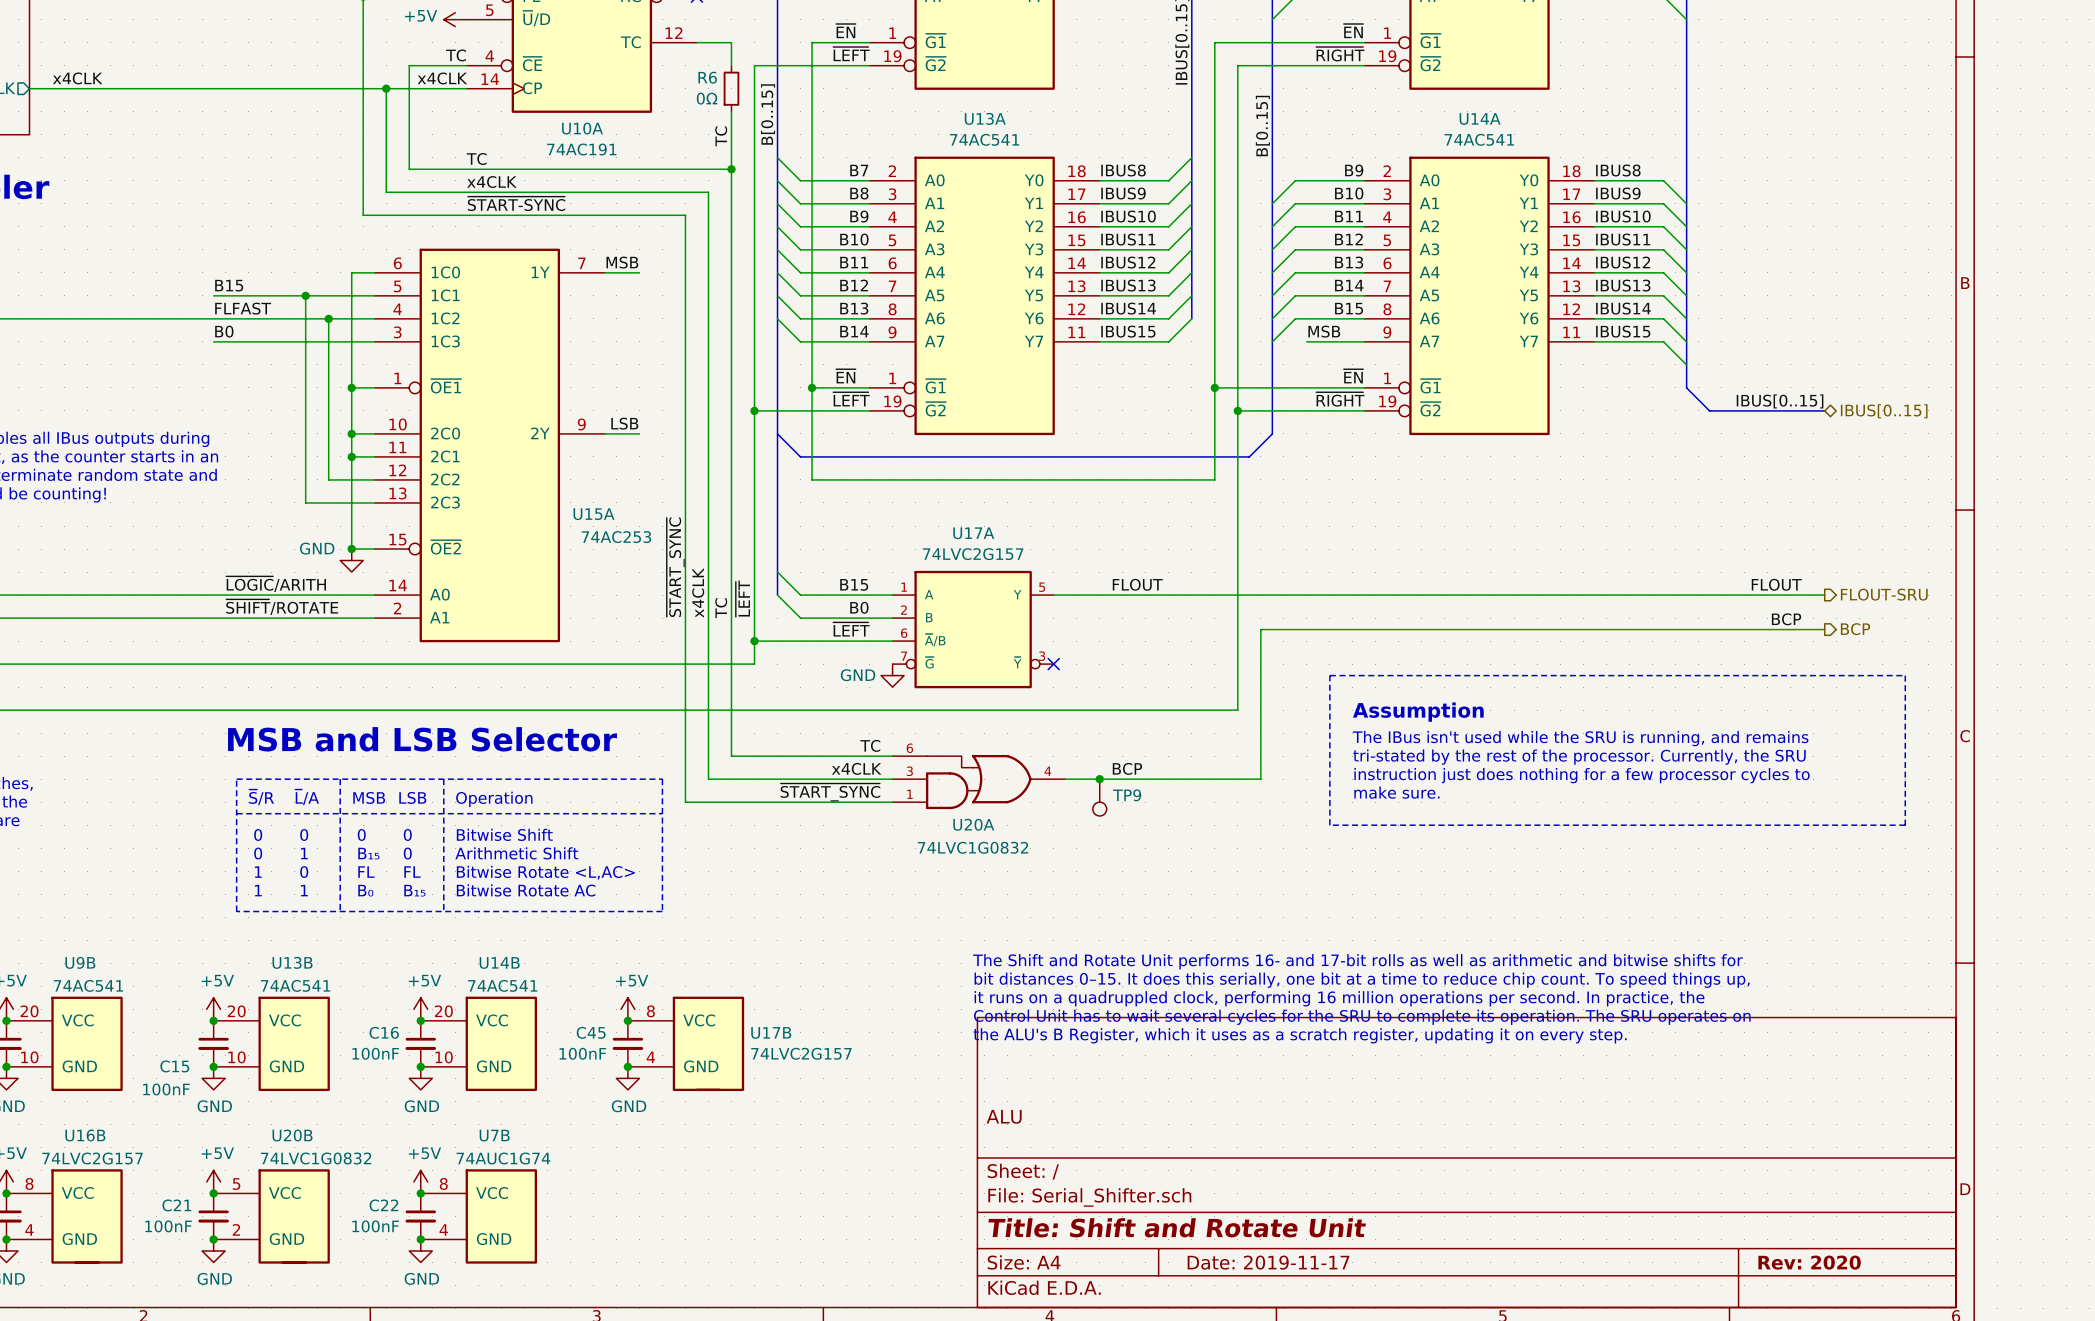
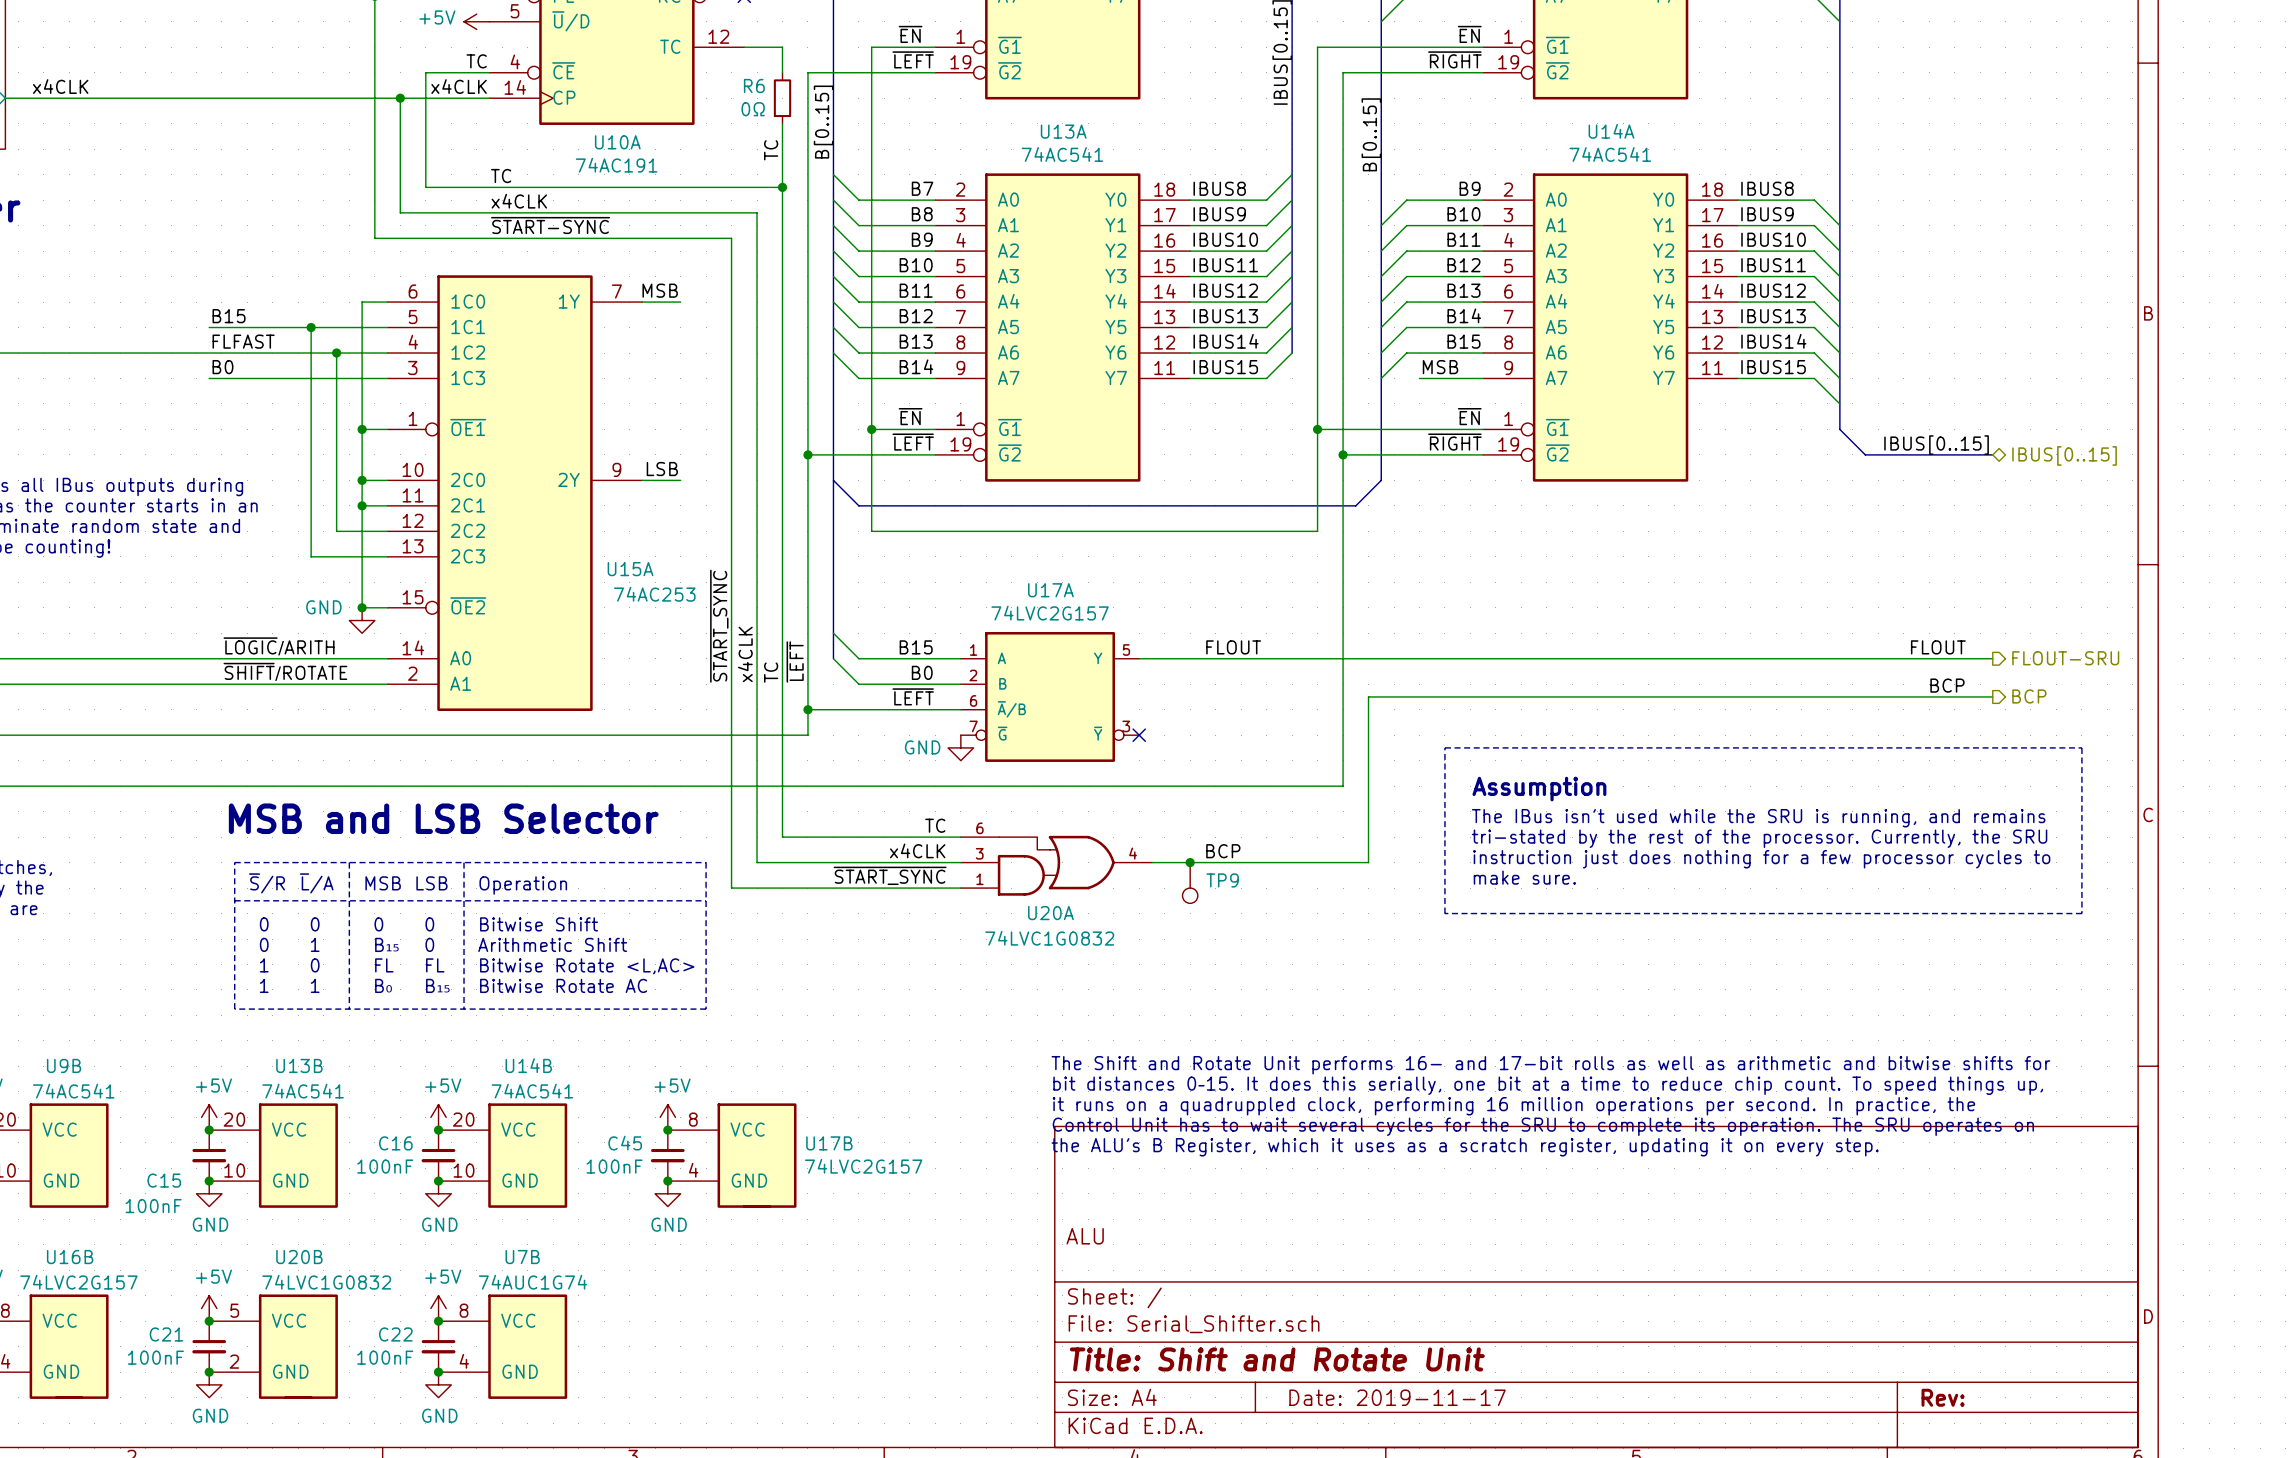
title block: Rev: 2020 (1809, 1262) -> Rev: (1943, 1397)

